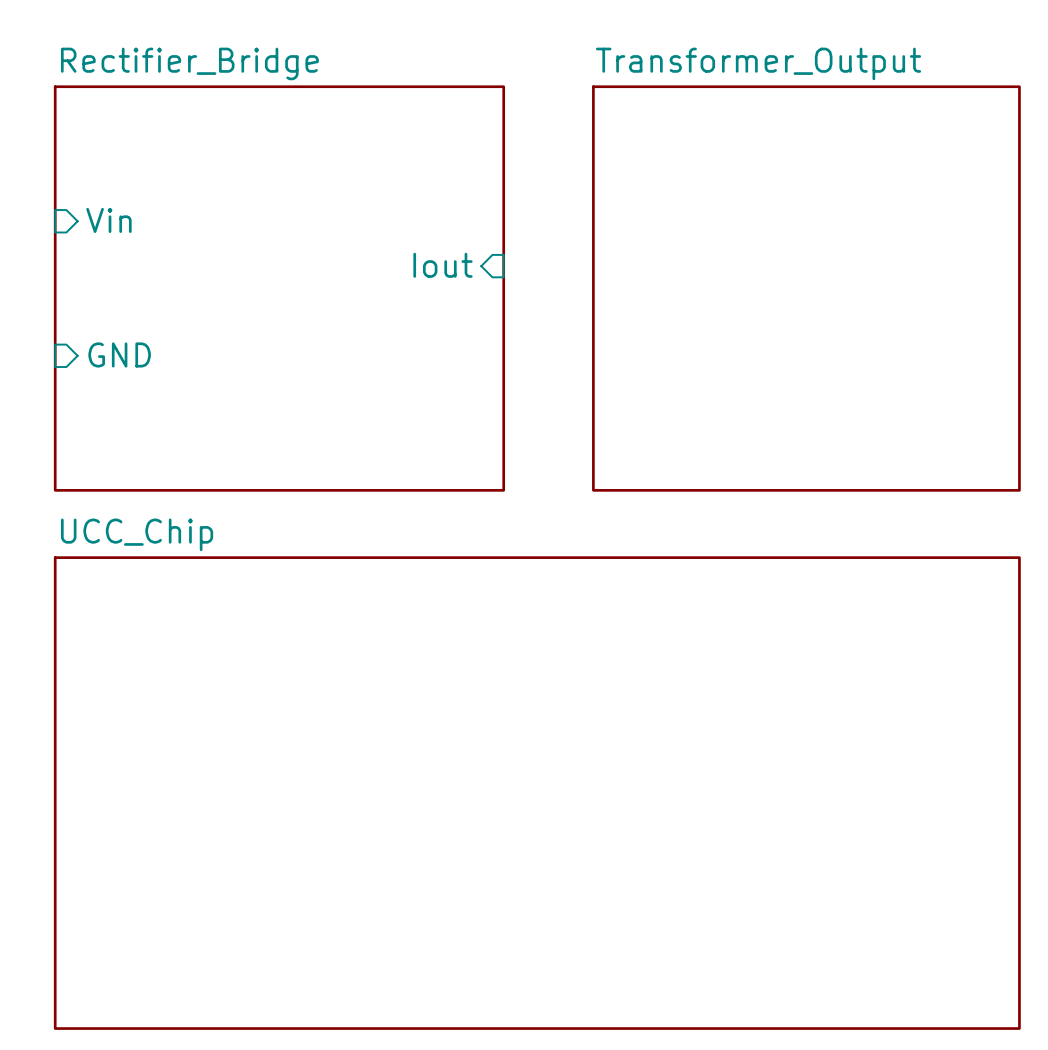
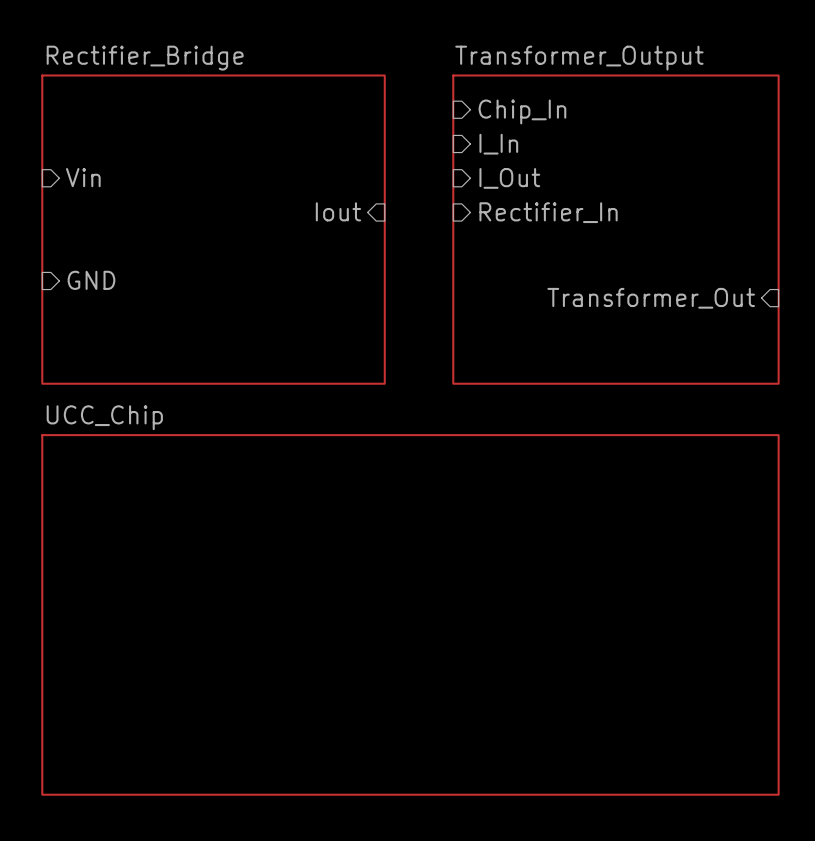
sheet pin: none -> Chip_In (522, 111)
sheet pin: none -> I_In (498, 144)
sheet pin: none -> I_Out (509, 178)
sheet pin: none -> Rectifier_In (548, 212)
sheet pin: none -> Transformer_Out (651, 298)

